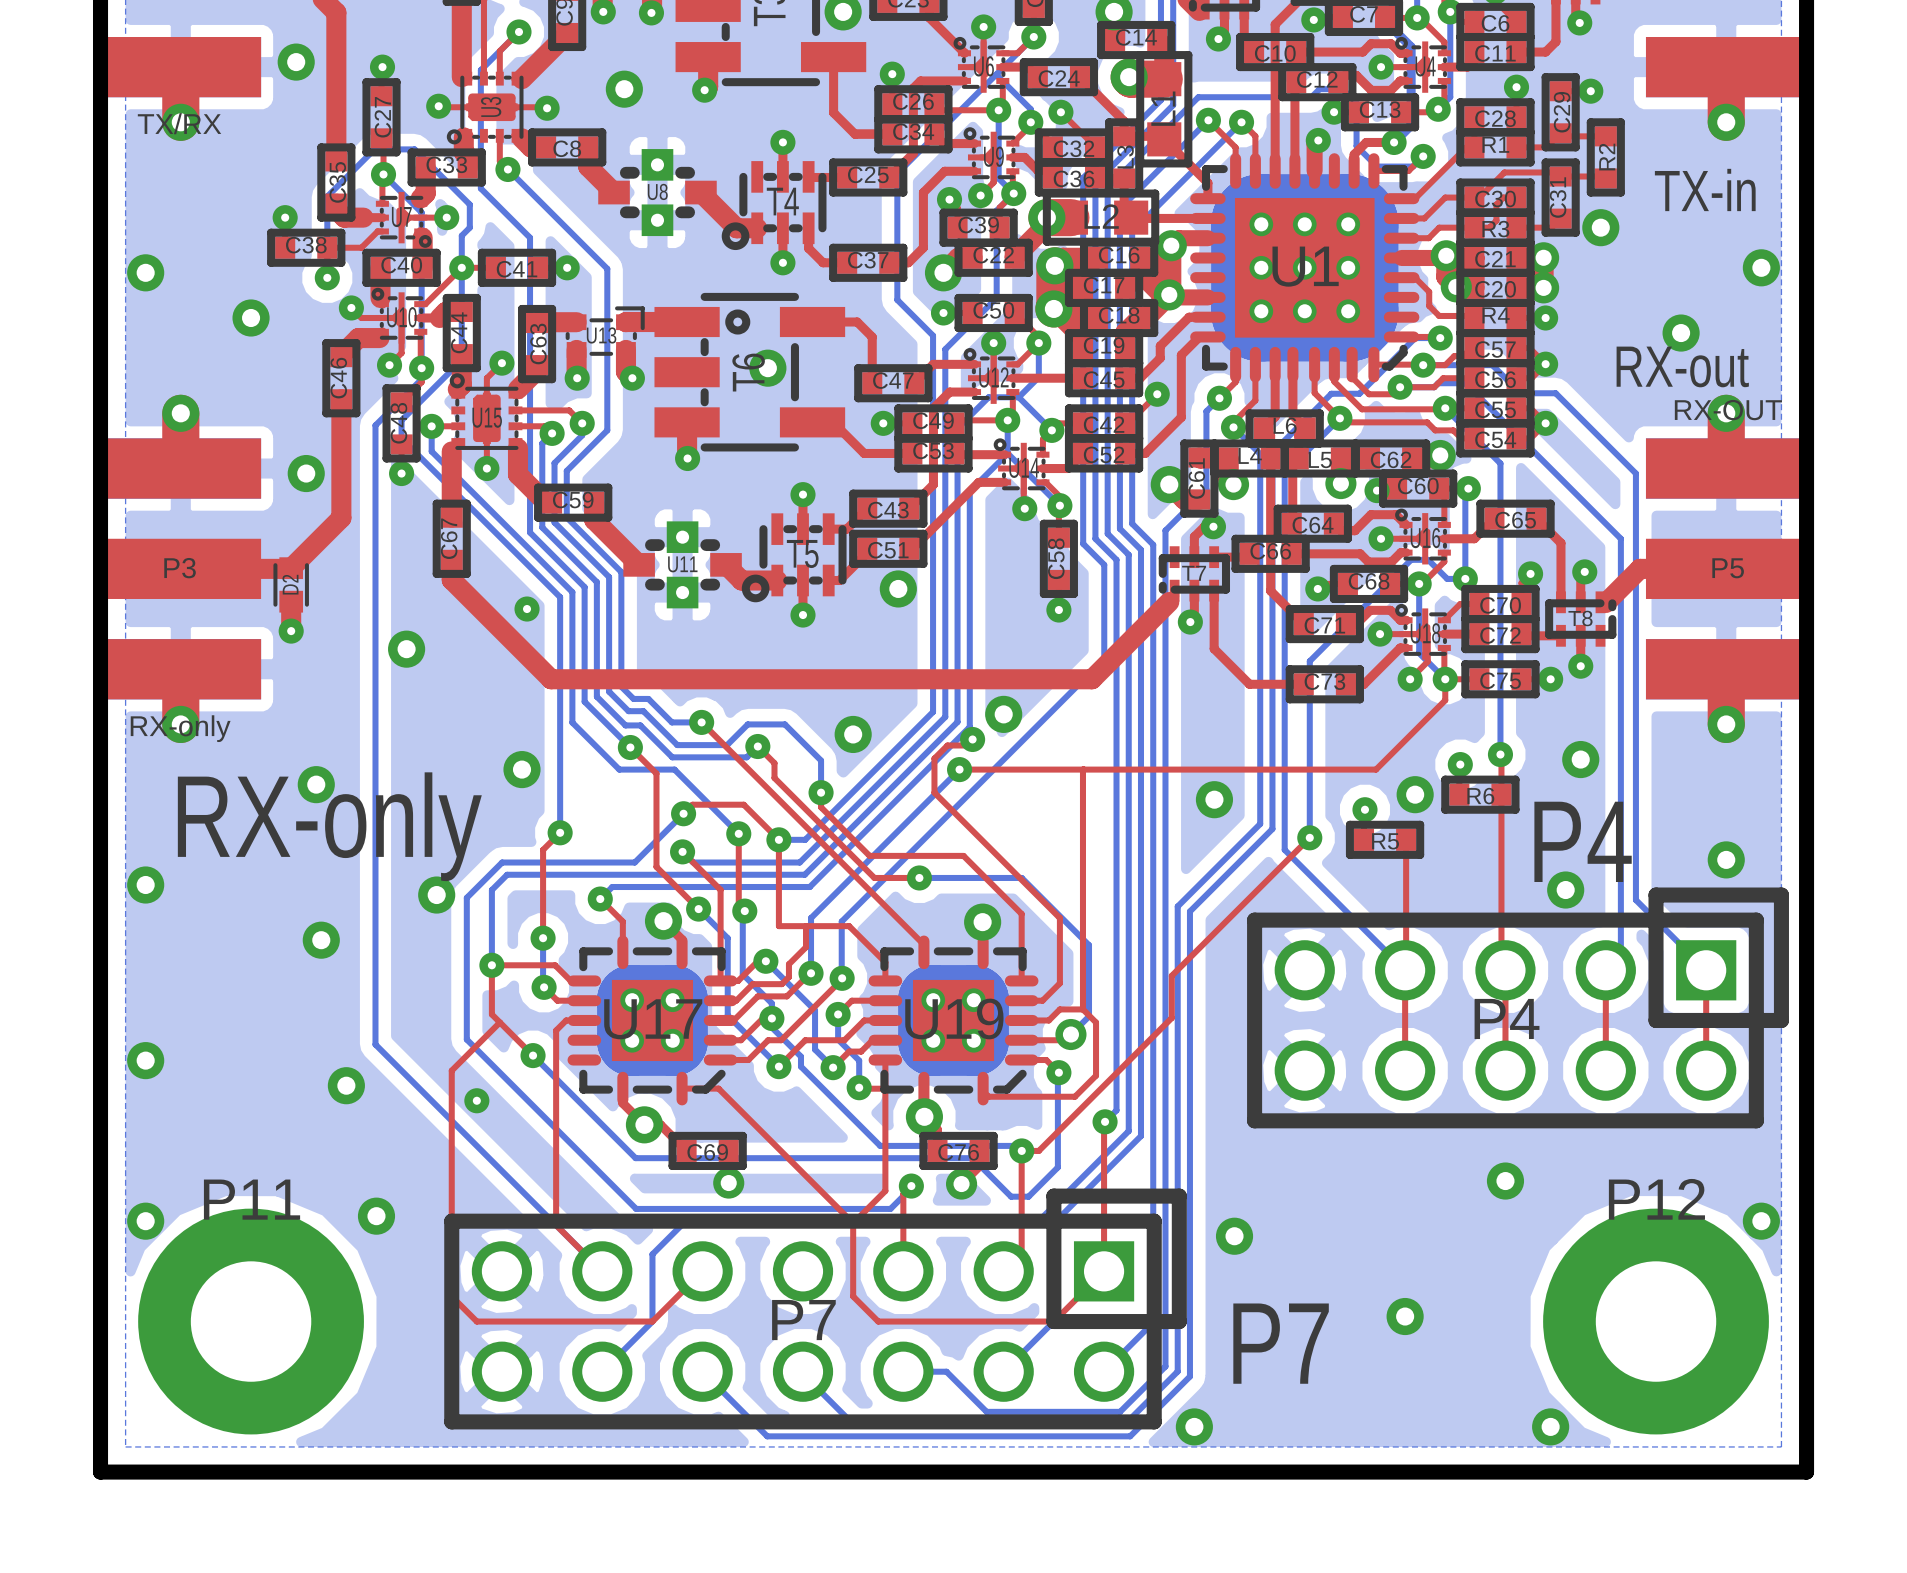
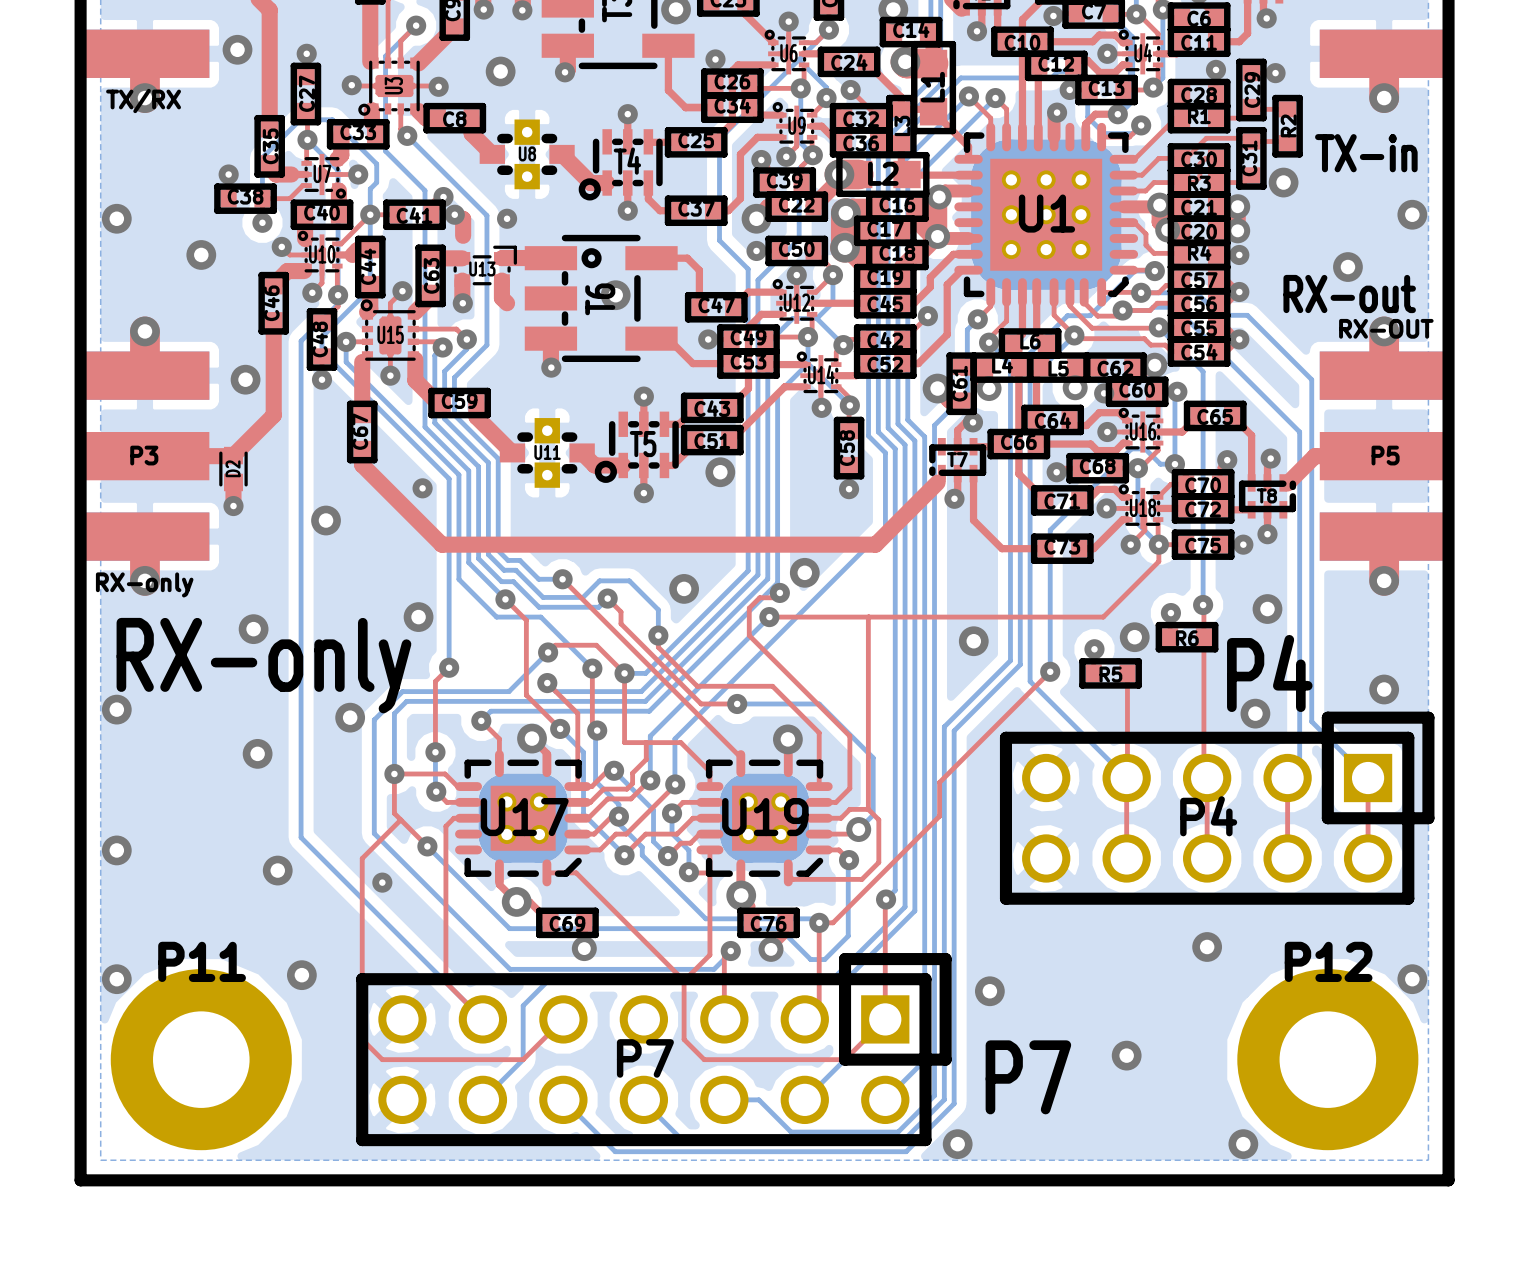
via: none -> (443, 197)
via: none -> (507, 218)
top track: none -> (463, 219) (463, 235)
via: (632, 378) -> none

